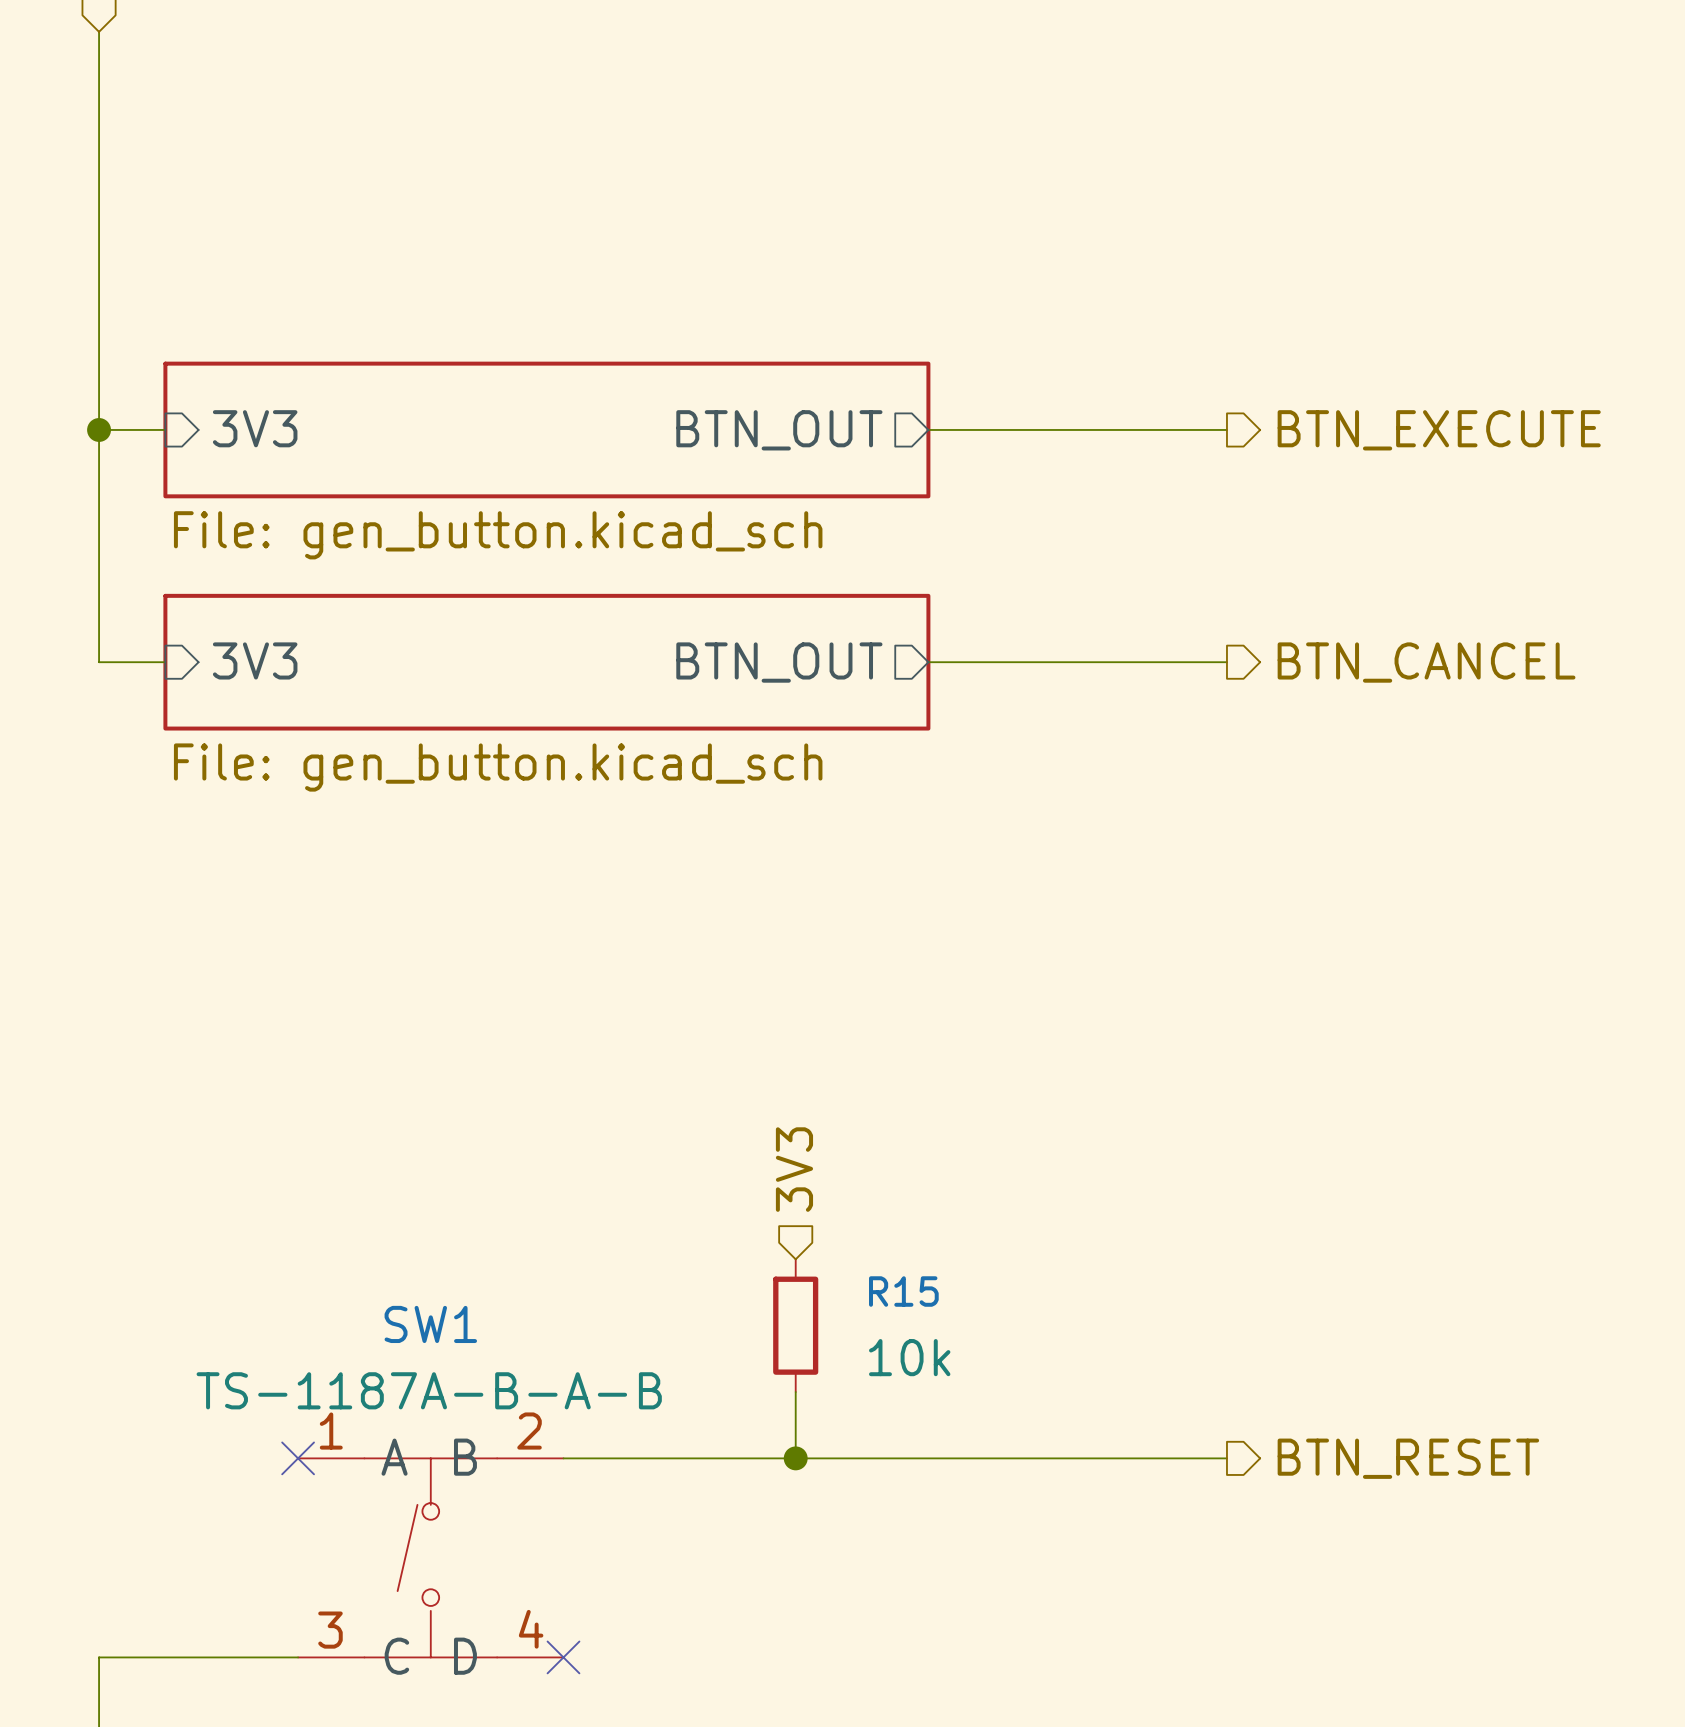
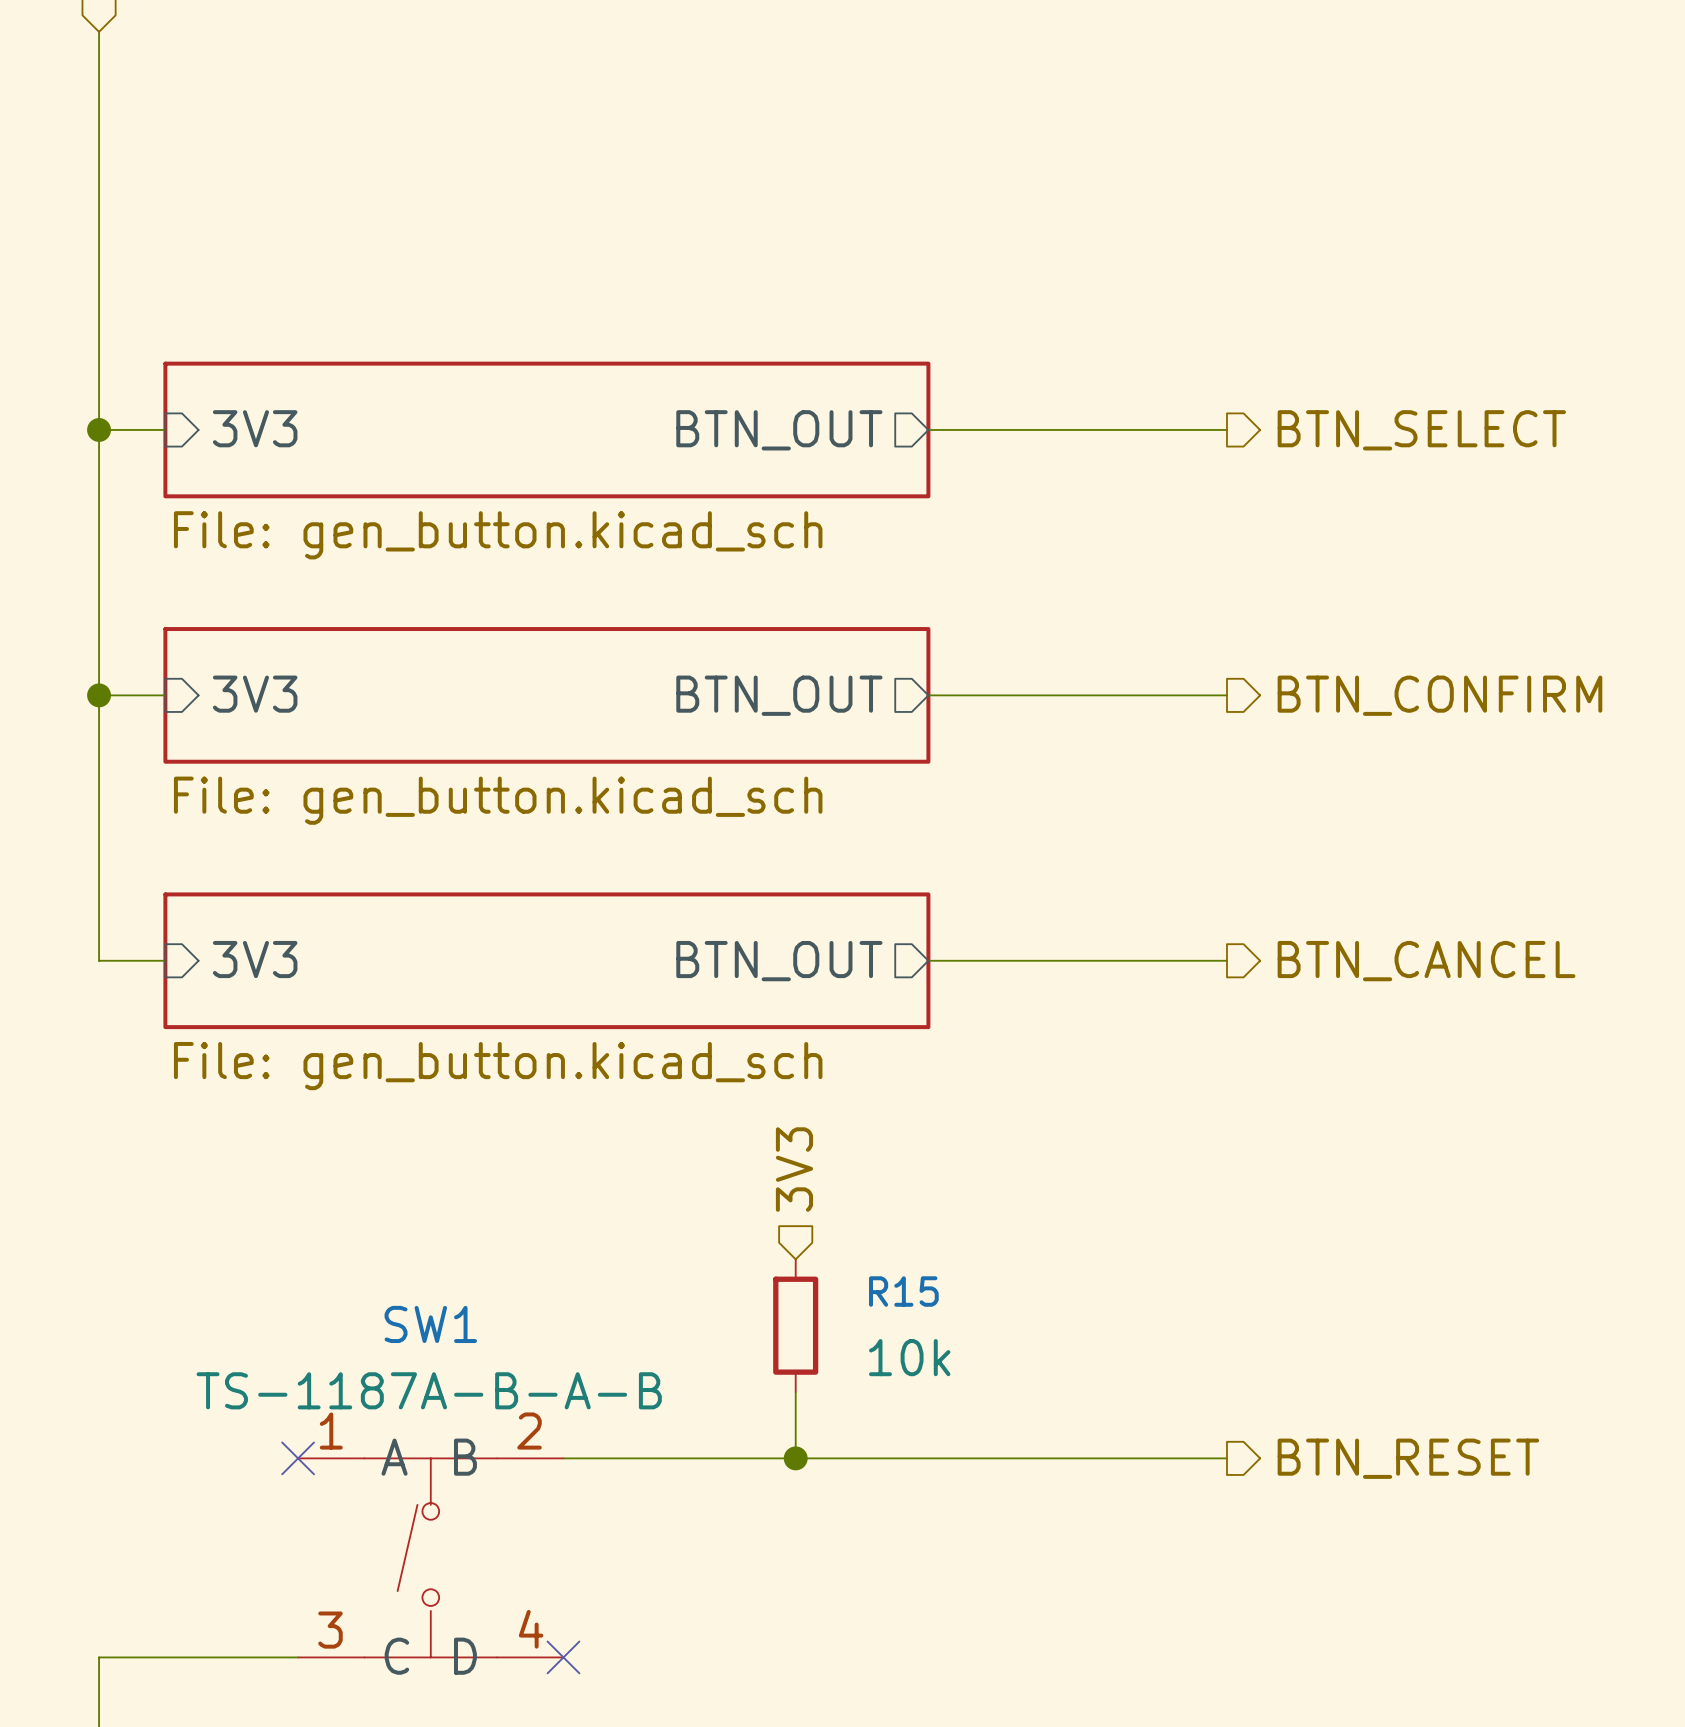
hierarchical label: BTN_EXECUTE (1439, 430) -> BTN_SELECT (1421, 430)
sheet pin position: 3V3 (255, 660) -> 3V3 (255, 694)
wire: (99, 662) (165, 662) -> (99, 662) (99, 960) (165, 960)
sheet position: (546, 662) -> (546, 695)
sheet pin position: BTN_OUT (779, 662) -> BTN_OUT (779, 695)
wire: (928, 662) (1226, 662) -> (928, 695) (1226, 695)
hierarchical label position: BTN_CANCEL (1426, 662) -> BTN_CANCEL (1426, 961)
wire: none -> (99, 695) (165, 695)
junction: none -> (99, 695)
hierarchical label: none -> BTN_CONFIRM (1439, 695)
sheet pin: none -> 3V3 (255, 959)
sheet: none -> File: gen_button.kicad_sch (546, 960)
wire: none -> (928, 960) (1226, 960)
sheet pin: none -> BTN_OUT (779, 961)

